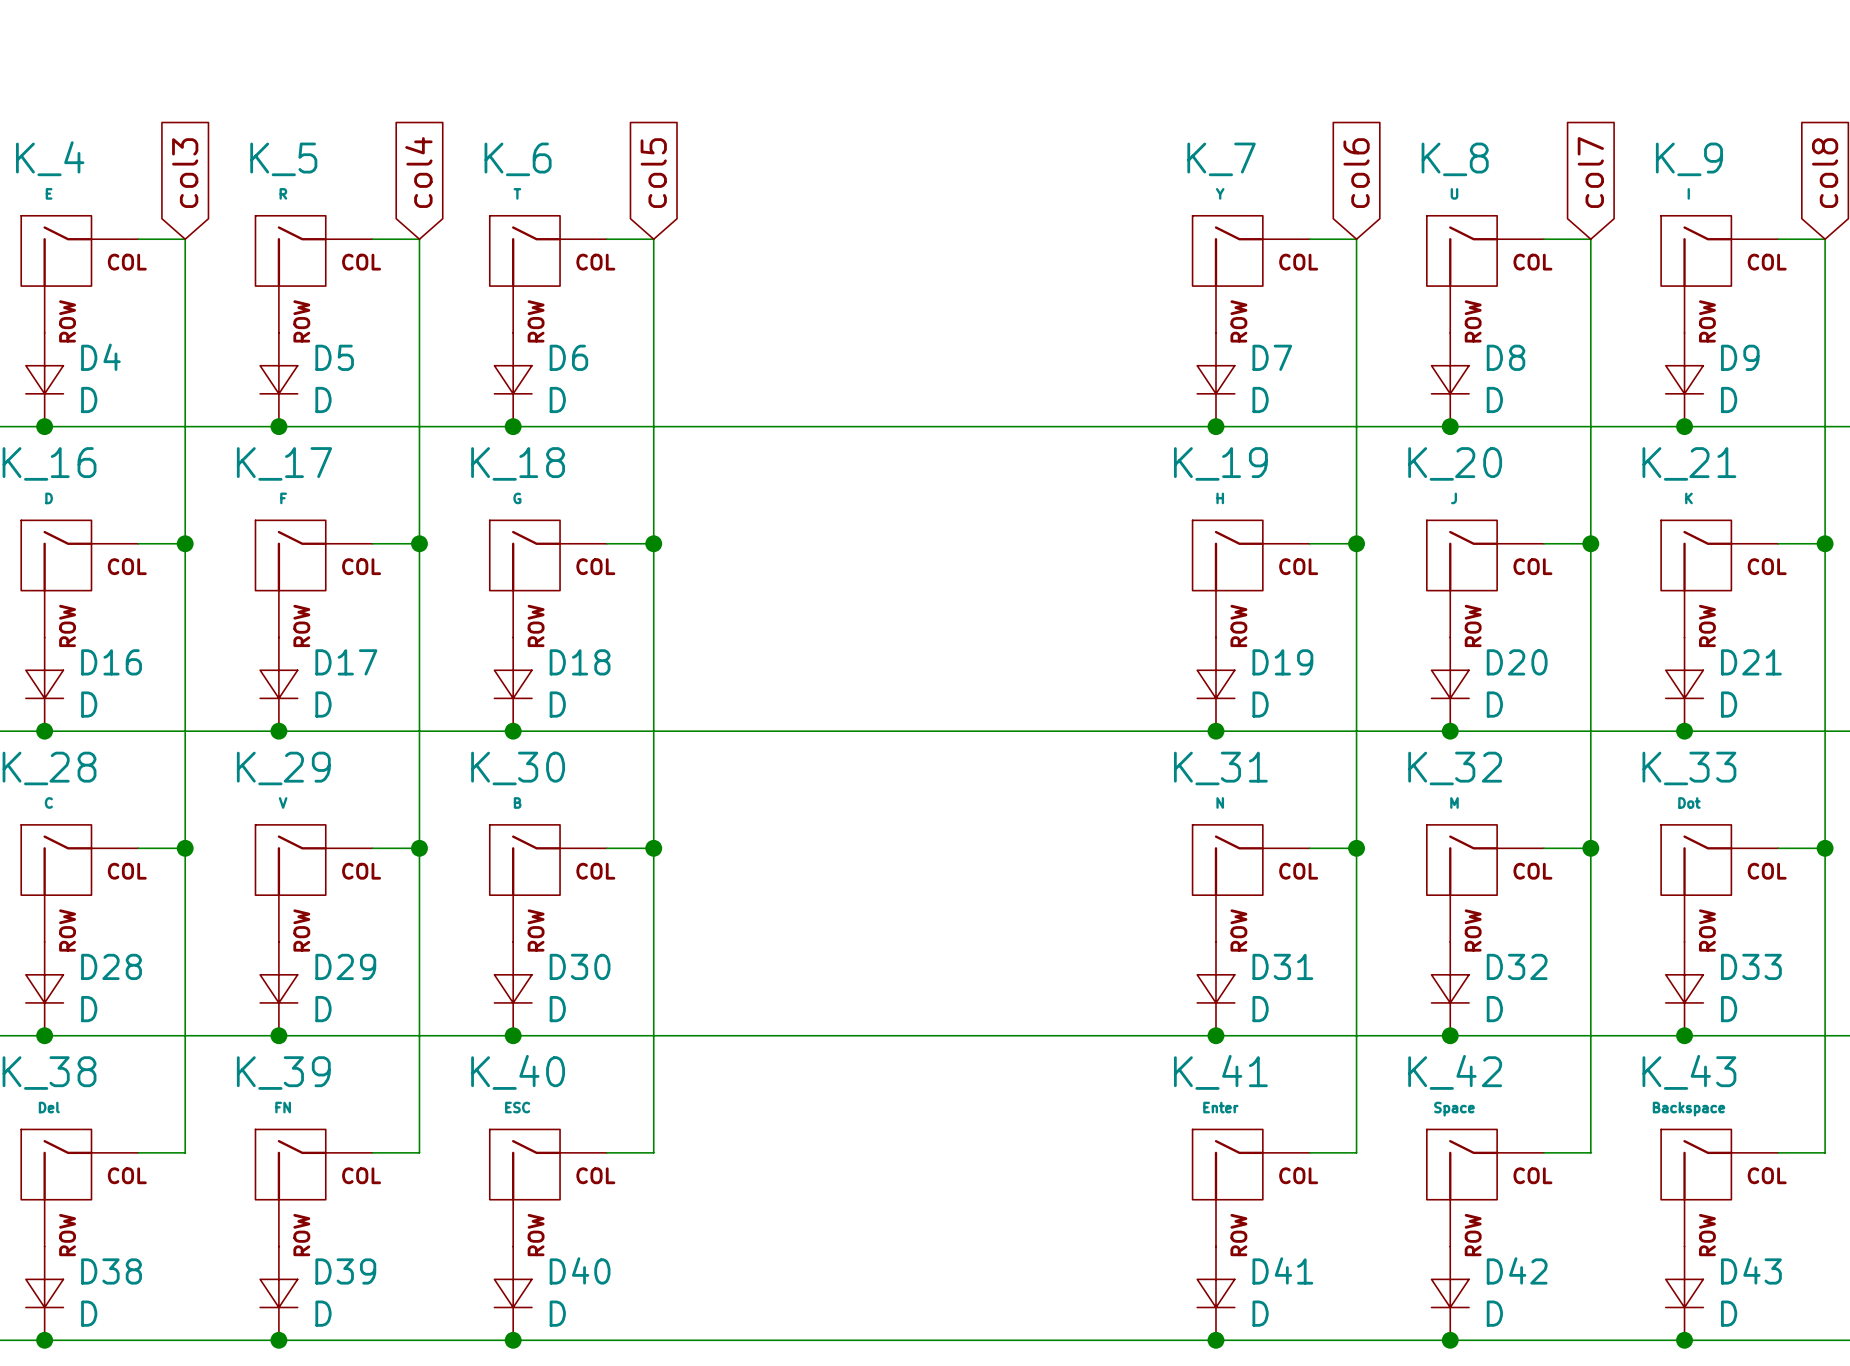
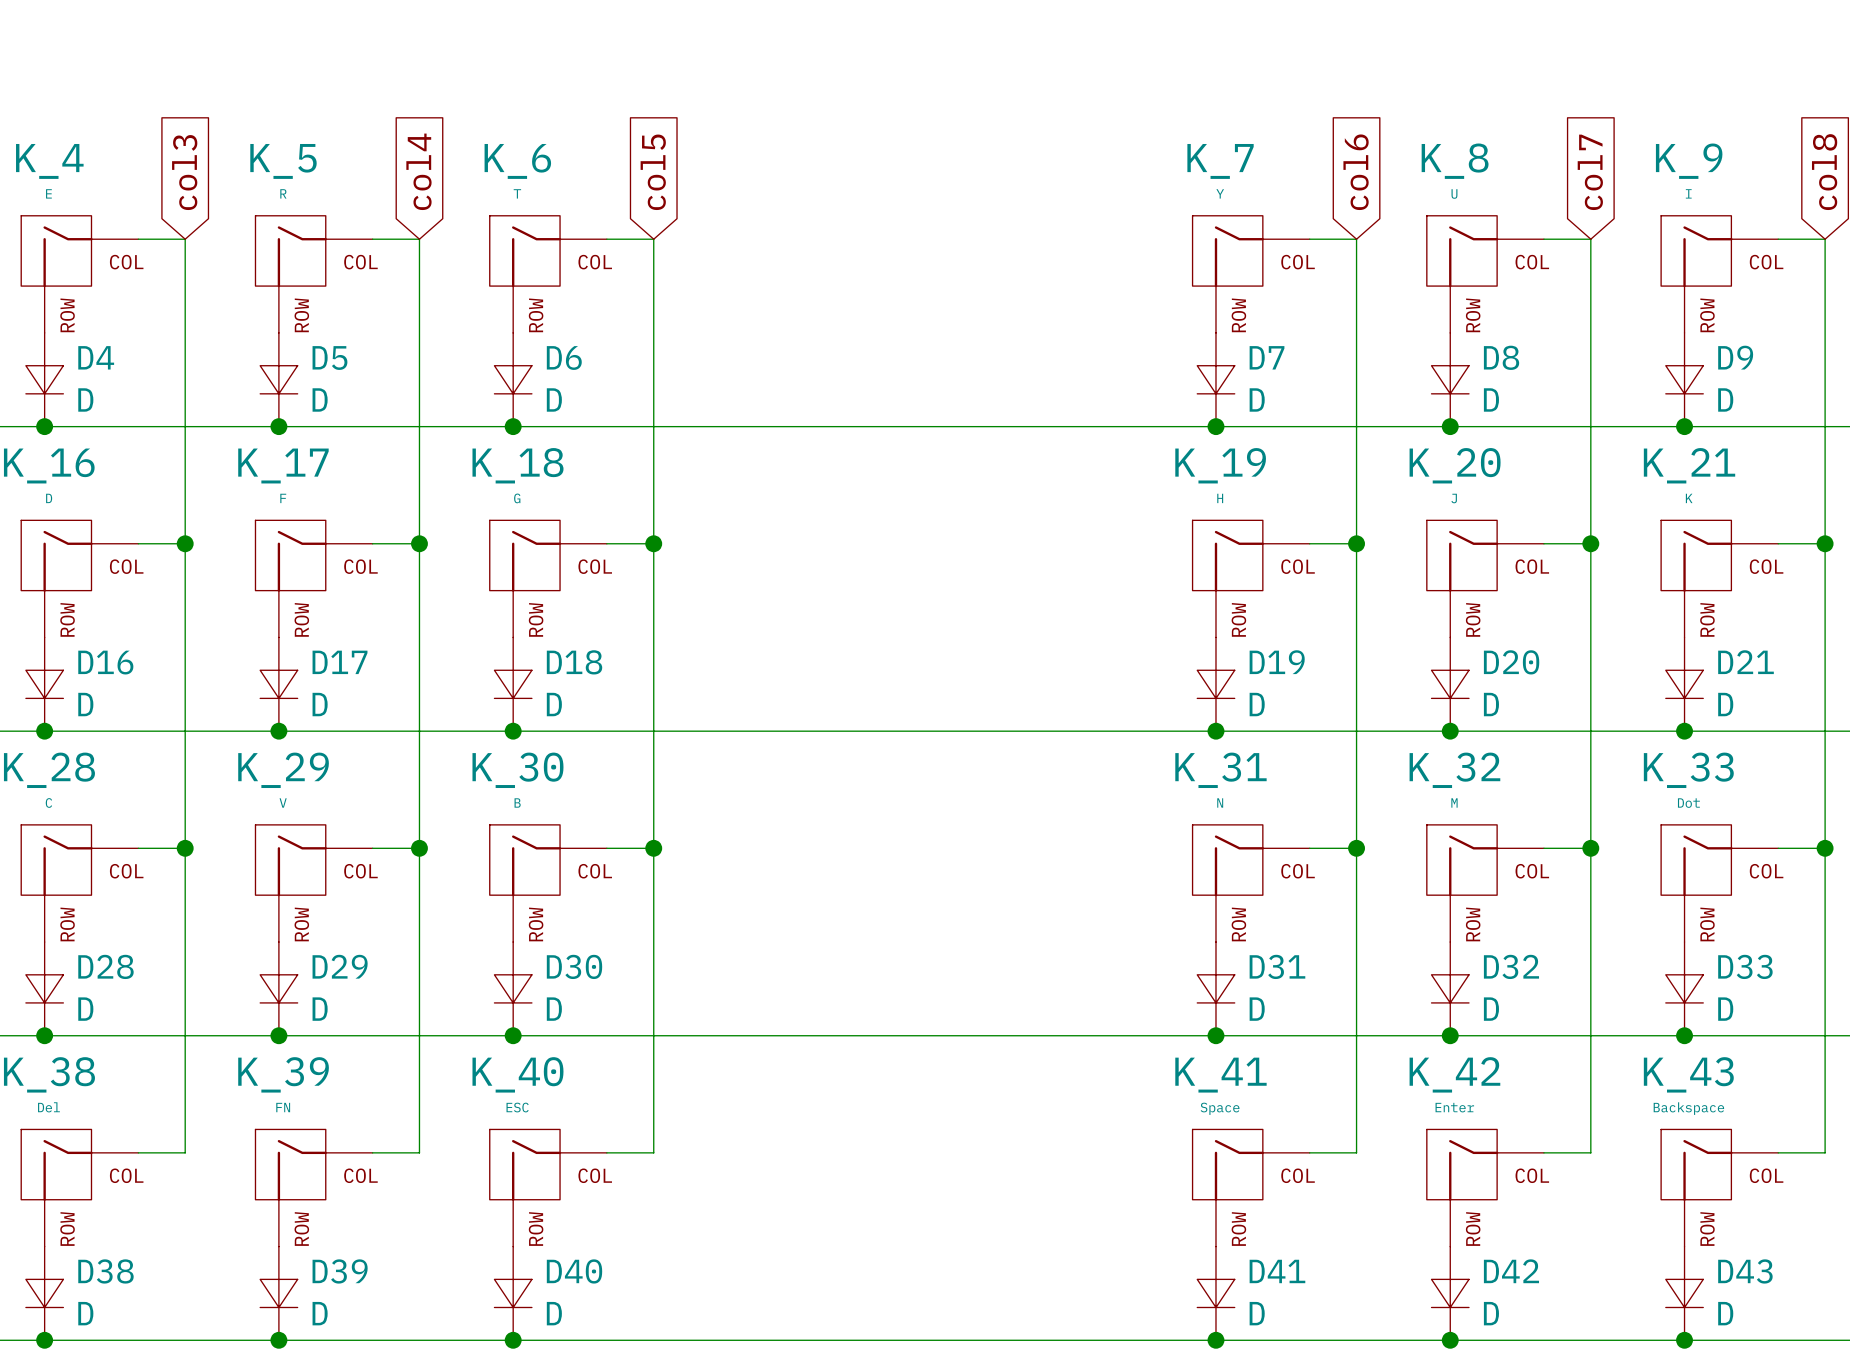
K_41 value: Enter (1220, 1107) -> Space (1220, 1108)
K_42 value: Space (1454, 1109) -> Enter (1454, 1107)

